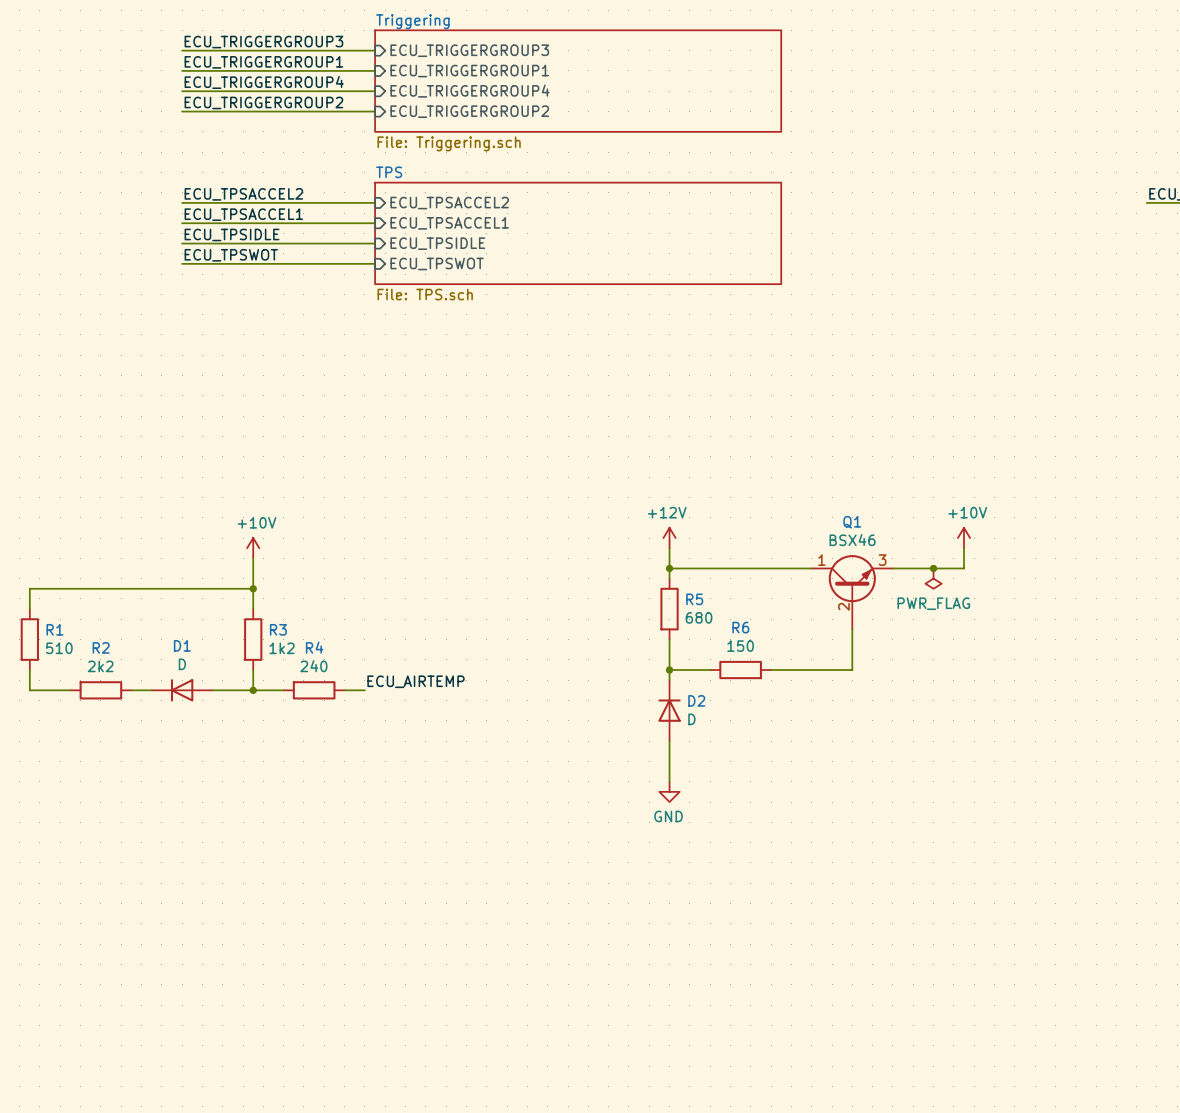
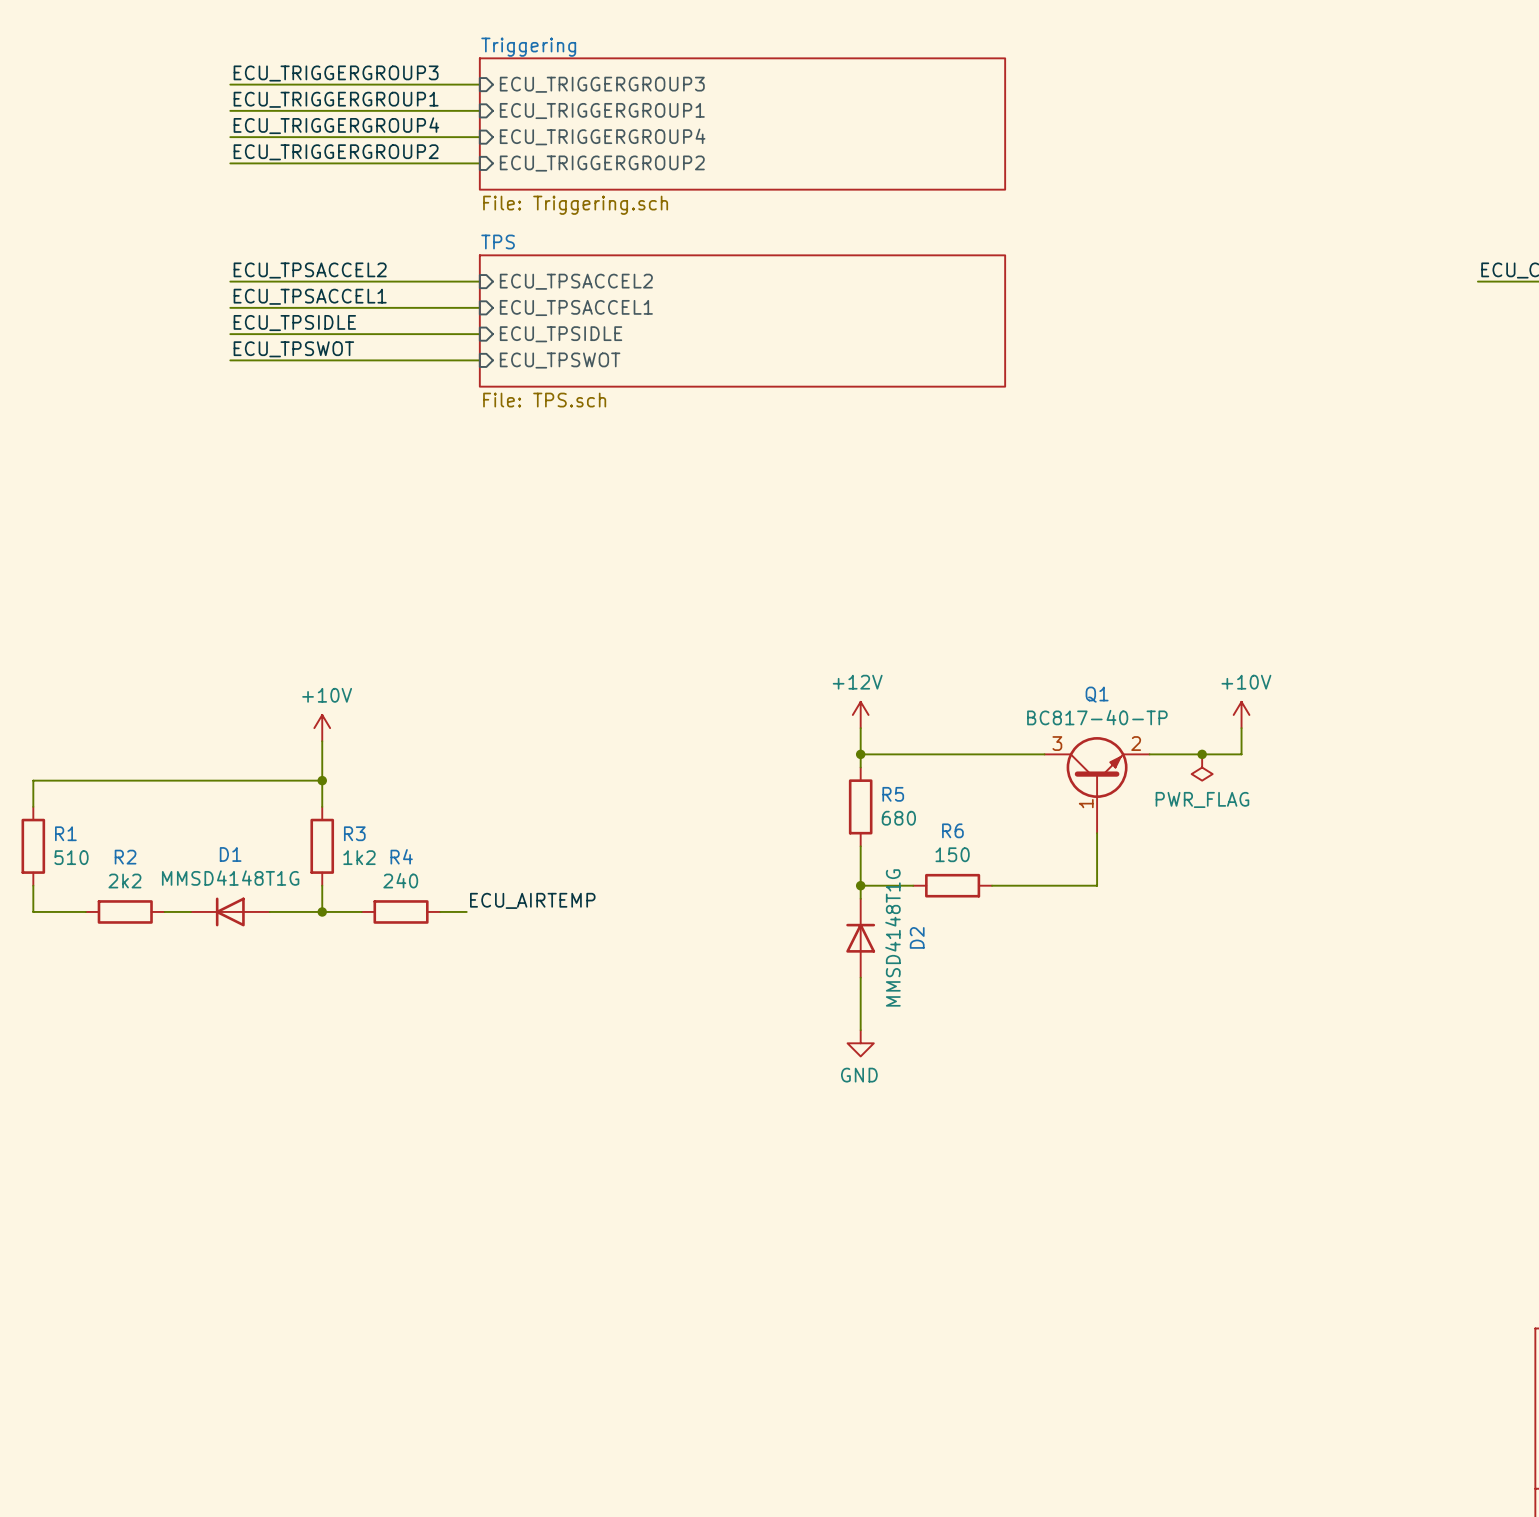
Q1 value: BSX46 (852, 540) -> BC817-40-TP (1097, 717)
Q1 pin number: 1 (821, 560) -> 3 (1057, 743)
Q1 pin number: 3 (882, 560) -> 2 (1136, 743)
Q1 pin number: 2 (843, 606) -> 1 (1086, 803)
D1 value: D (182, 664) -> MMSD4148T1G (230, 878)
D2 name rotation: 0° (696, 700) -> 90° counterclockwise (917, 937)
D2 value: D (691, 719) -> MMSD4148T1G (892, 937)

